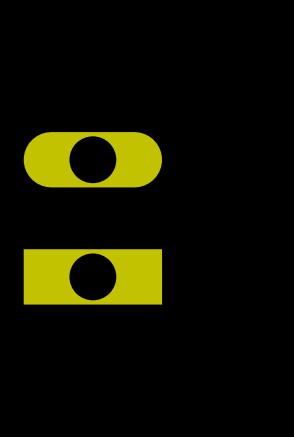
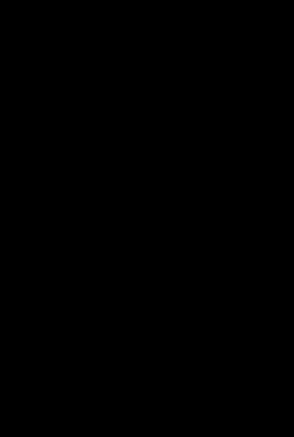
part: (92, 218) -> none

